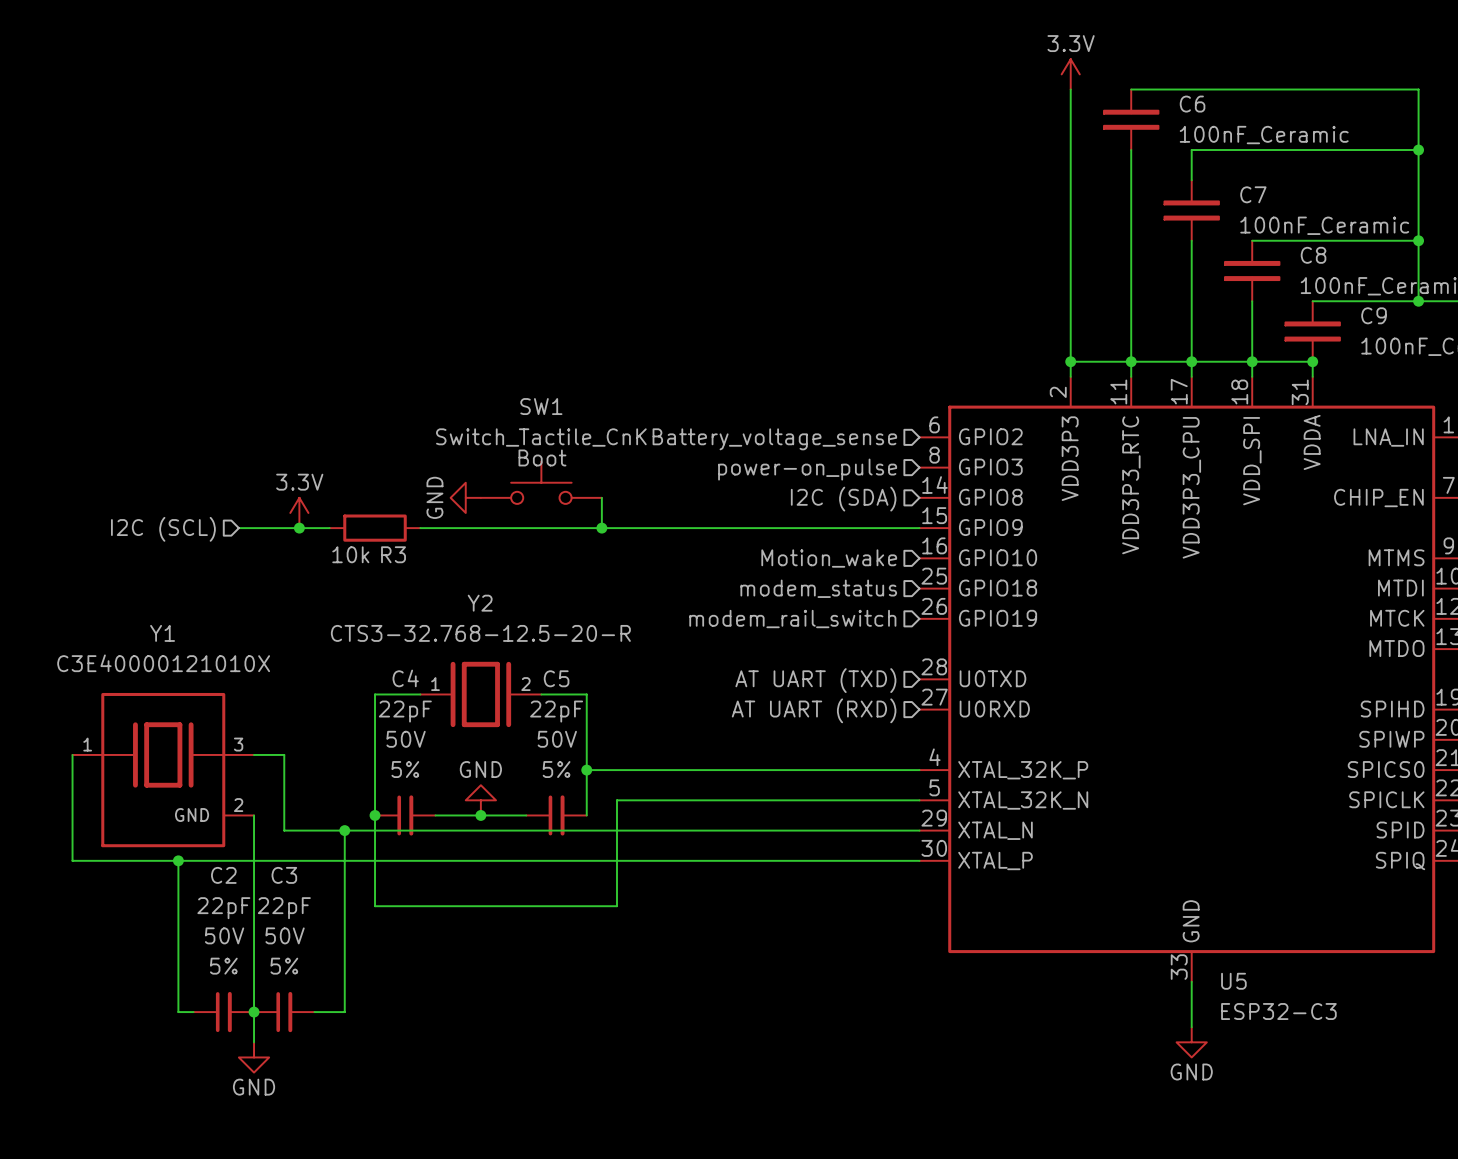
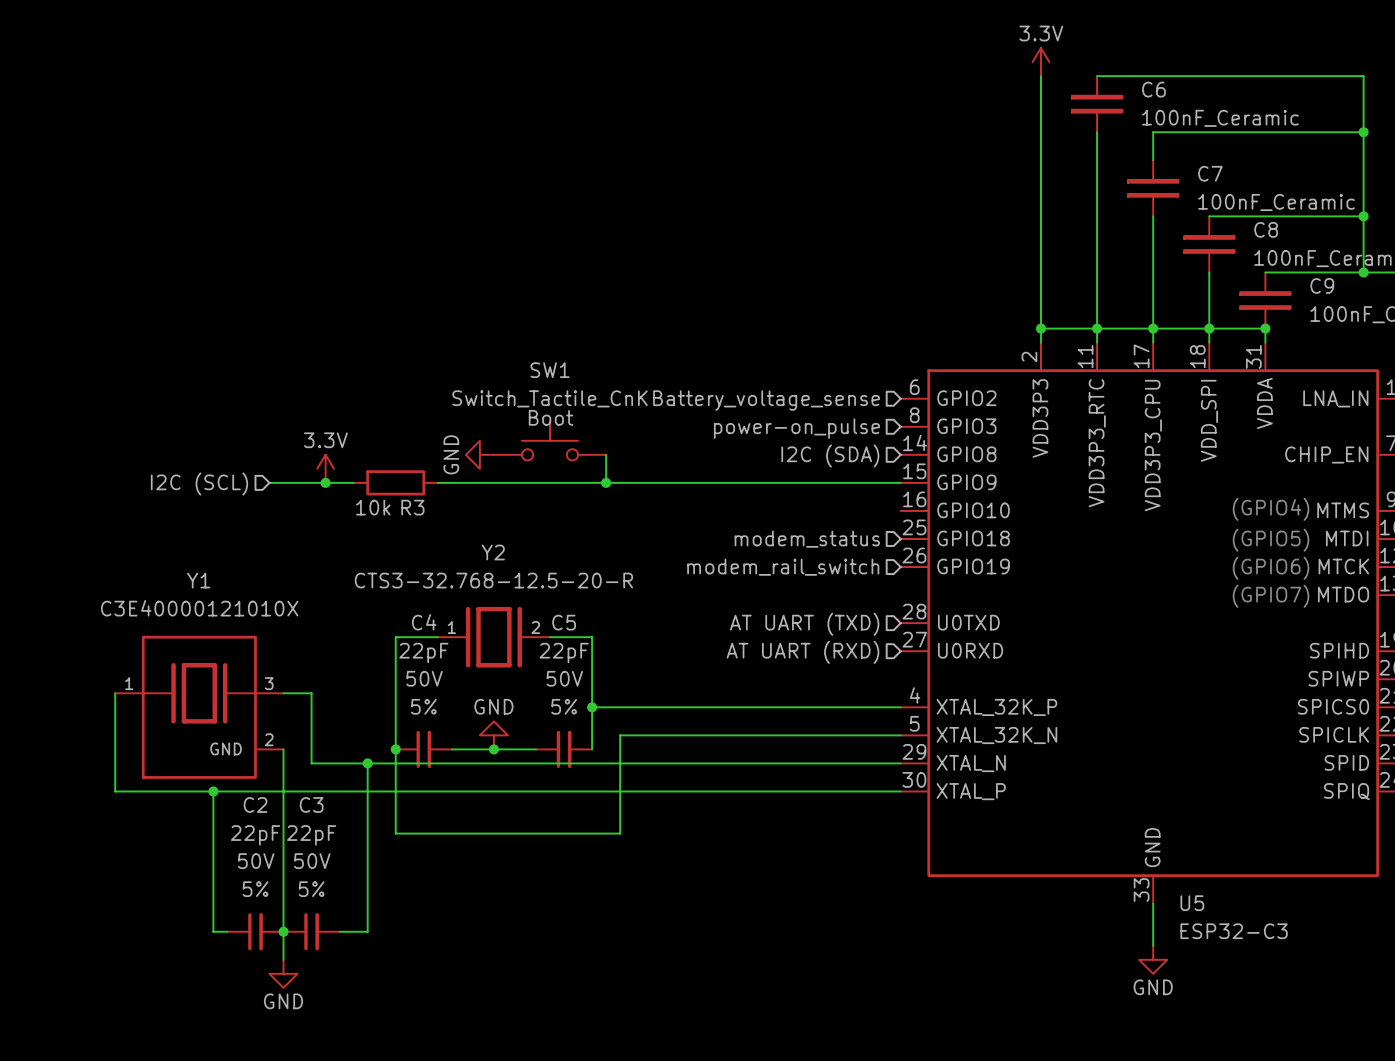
text: none -> (GPIO4) (1271, 509)
hierarchical label: Motion_wake (829, 558) -> none
text: none -> (GPIO5) (1271, 540)
text: none -> (GPIO6) (1271, 568)
text: none -> (GPIO7) (1271, 596)

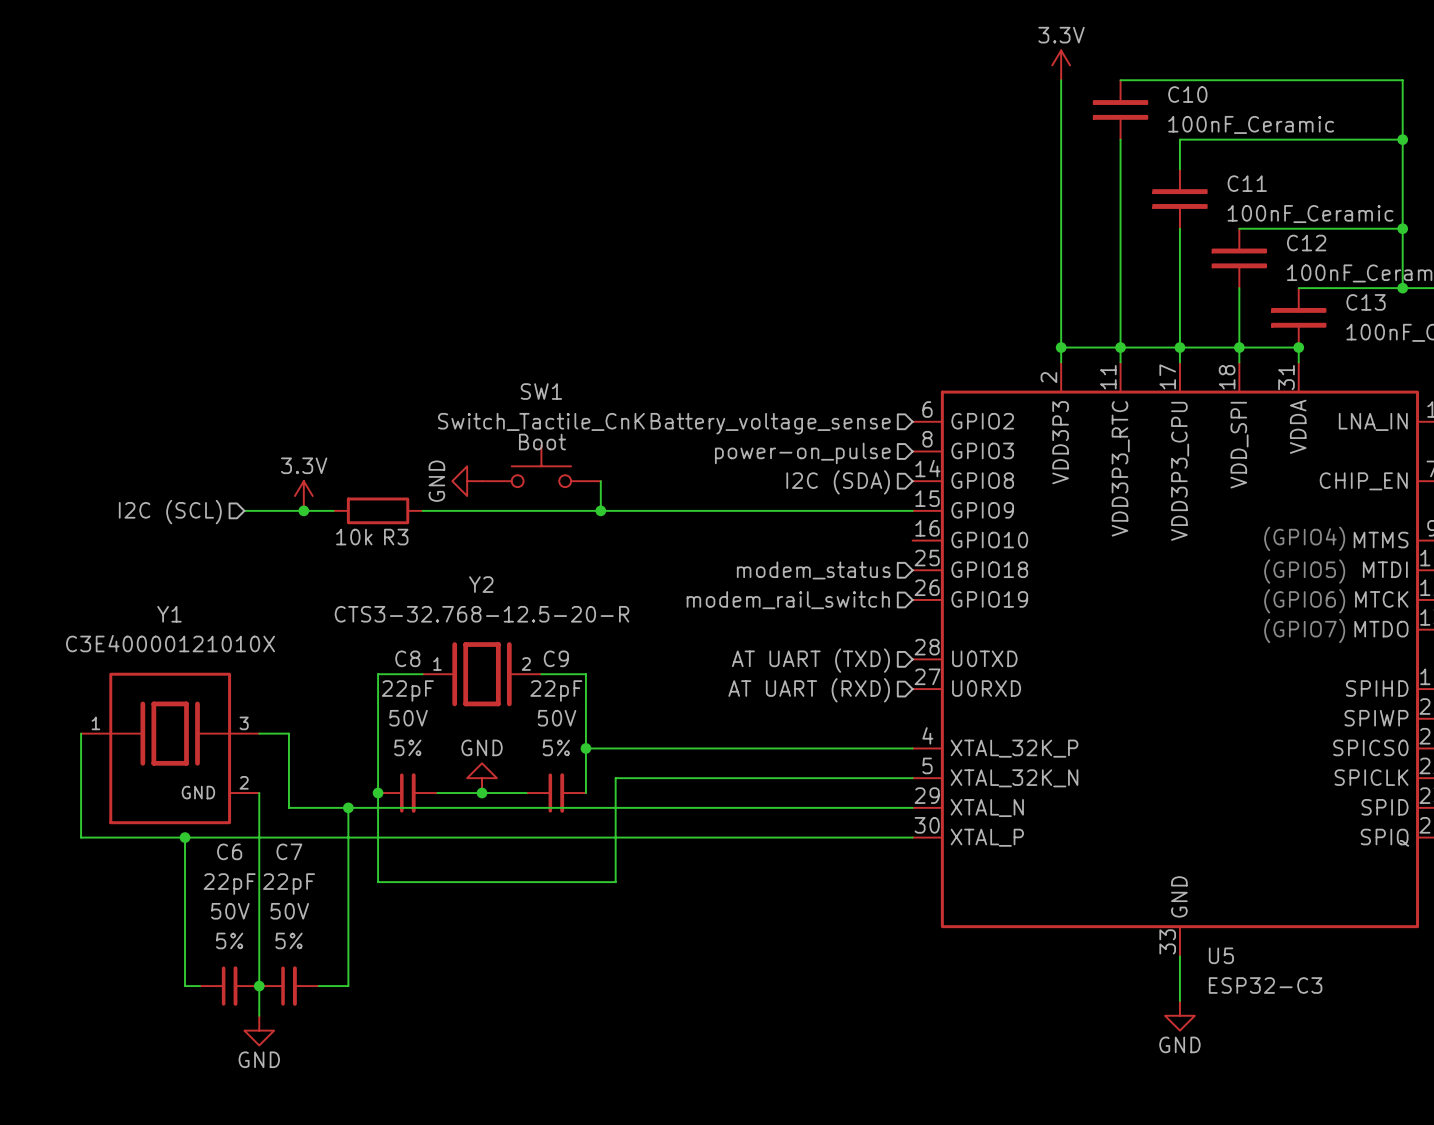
C6 name: C6 (1153, 89) -> C10 (1187, 94)
C7 name: C7 (1210, 173) -> C11 (1247, 183)
C8 name: C8 (1266, 229) -> C12 (1306, 243)
C9 name: C9 (1322, 285) -> C13 (1366, 302)
C4 name: C4 (424, 622) -> C8 (407, 658)
C5 name: C5 (564, 622) -> C9 (556, 658)
C2 name: C2 (255, 804) -> C6 (229, 851)
C3 name: C3 (311, 804) -> C7 (289, 851)

